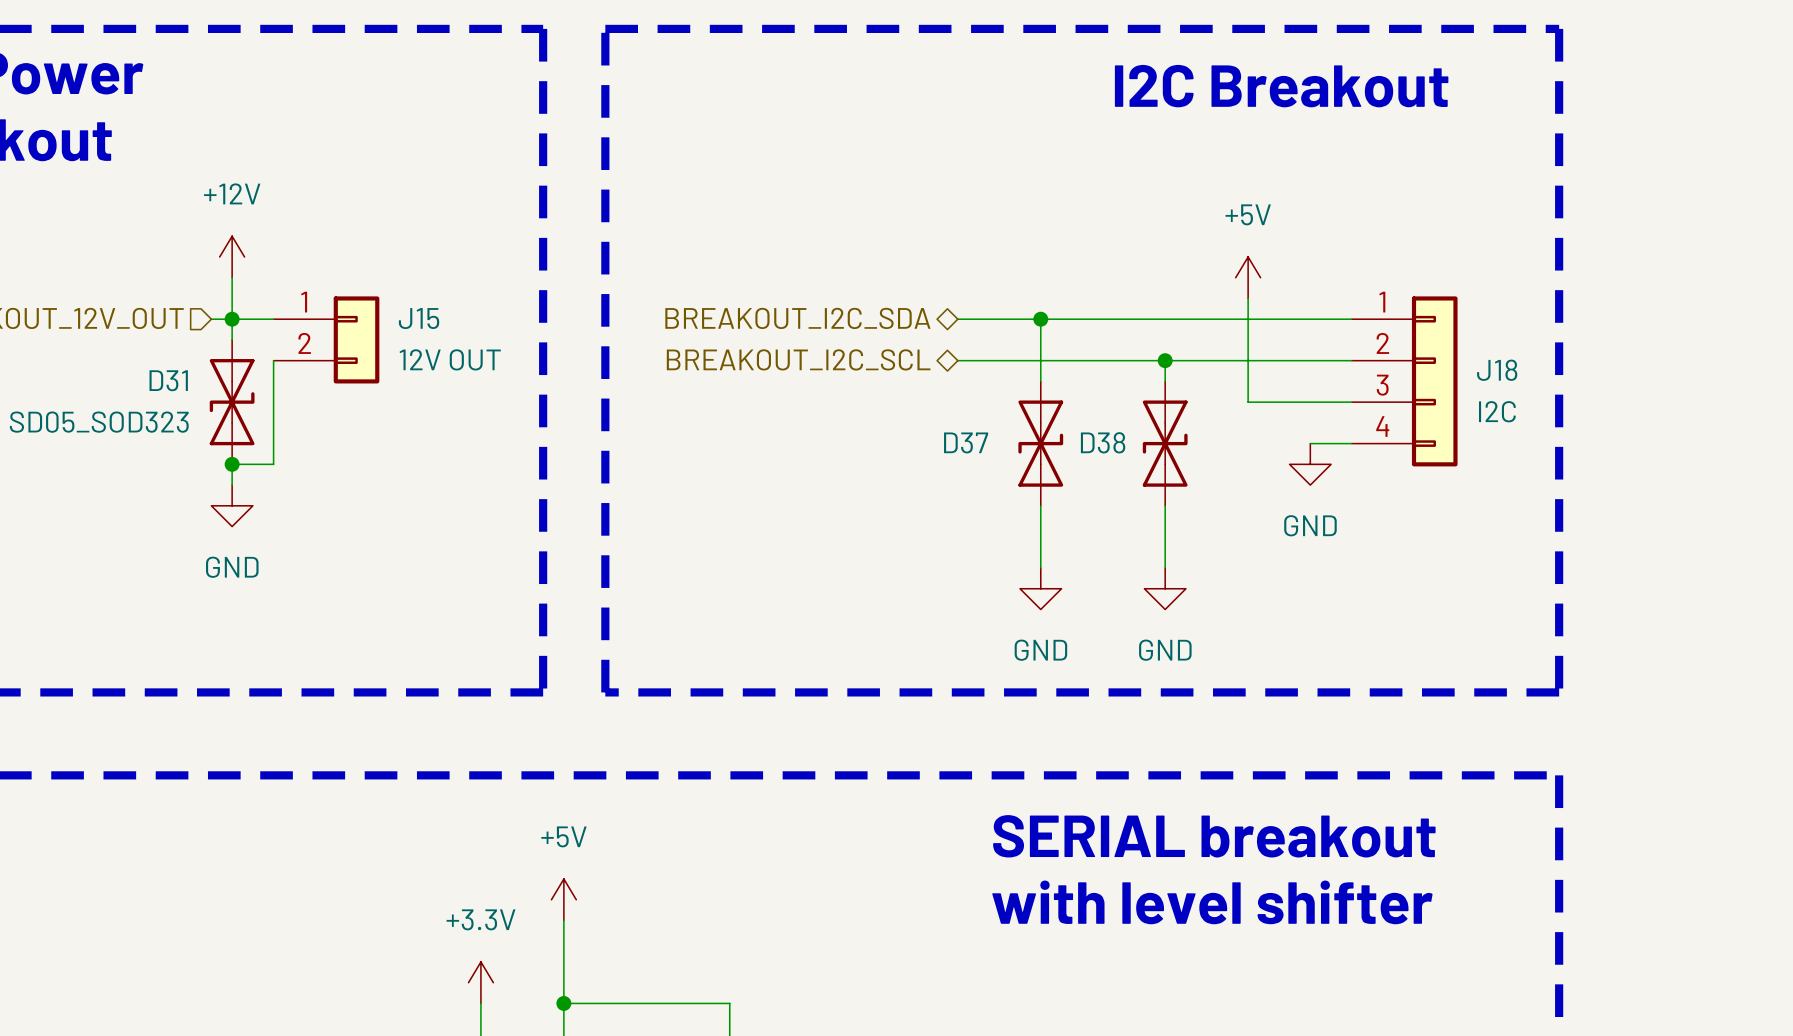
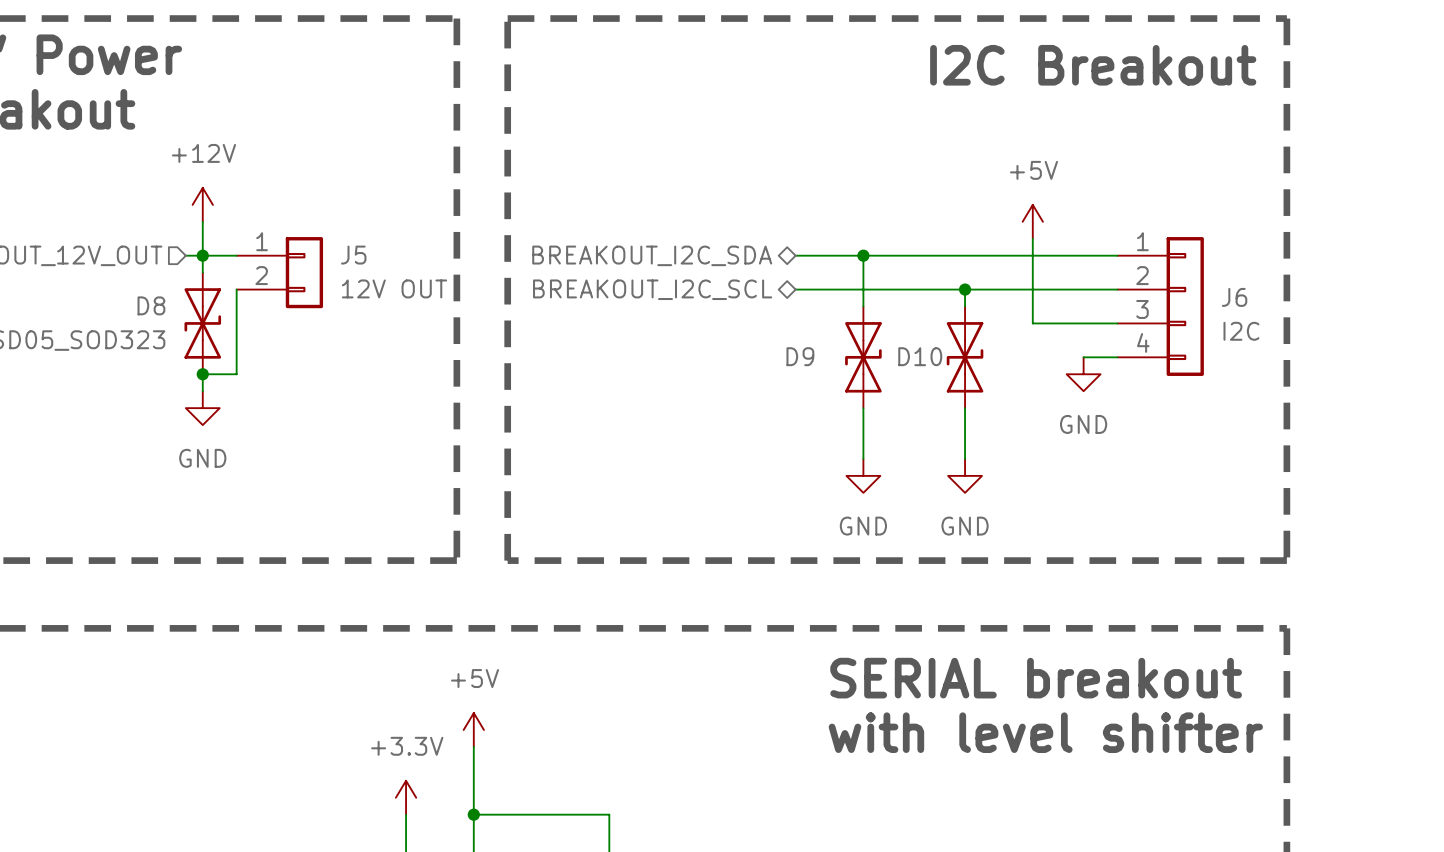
J15 name: J15 (419, 318) -> J5 (353, 255)
J18 name: J18 (1497, 370) -> J6 (1234, 297)
D31 name: D31 (168, 380) -> D8 (151, 305)
D37 name: D37 (966, 442) -> D9 (800, 356)
D38 name: D38 (1103, 442) -> D10 (920, 356)

